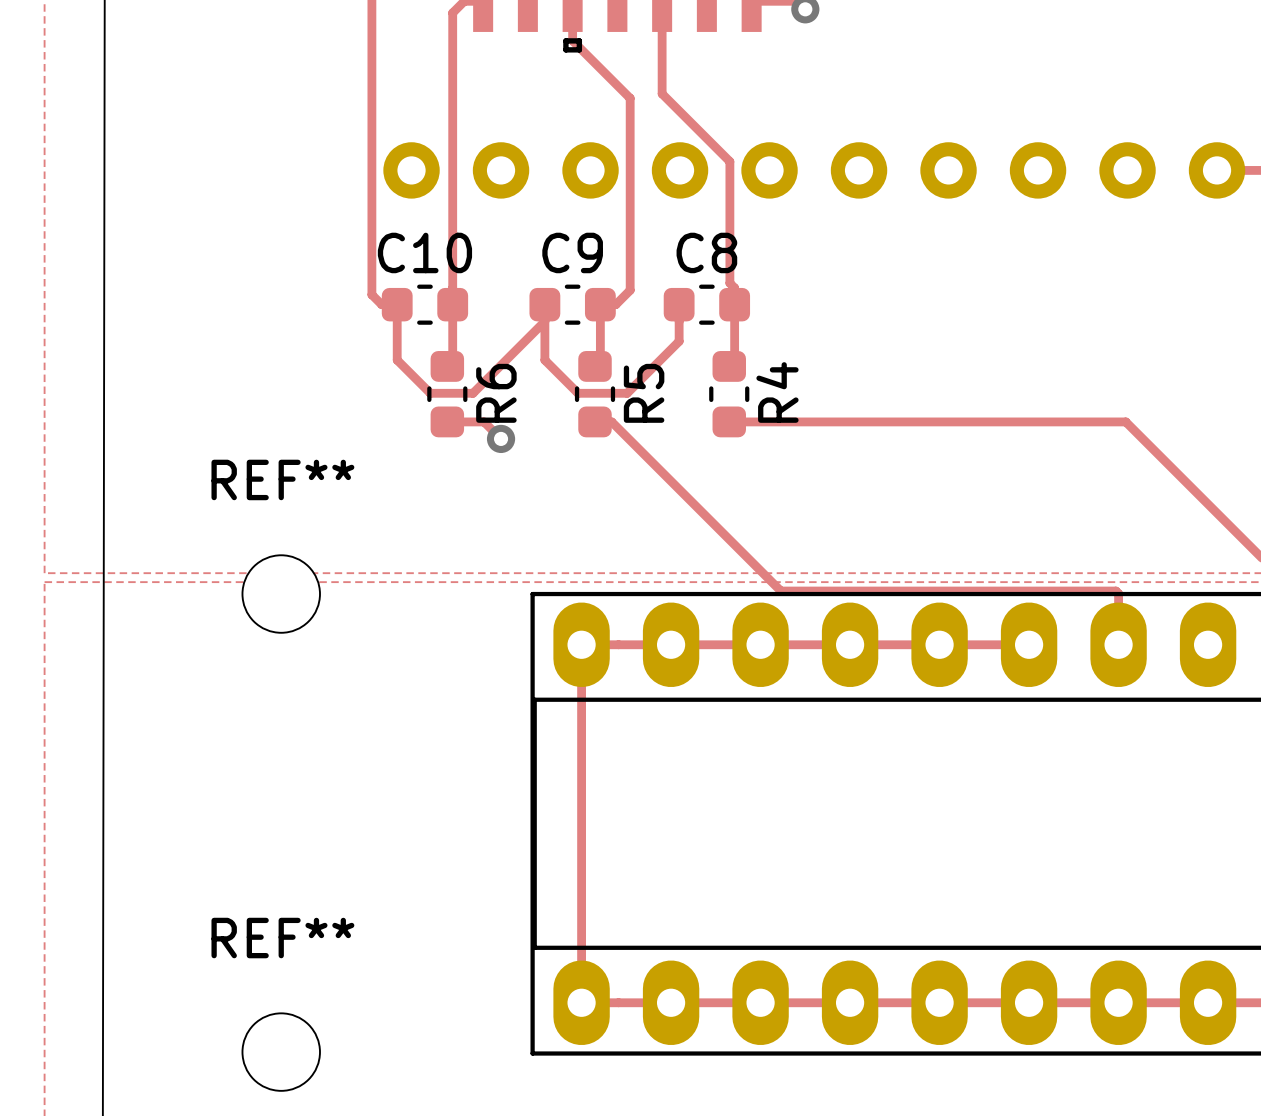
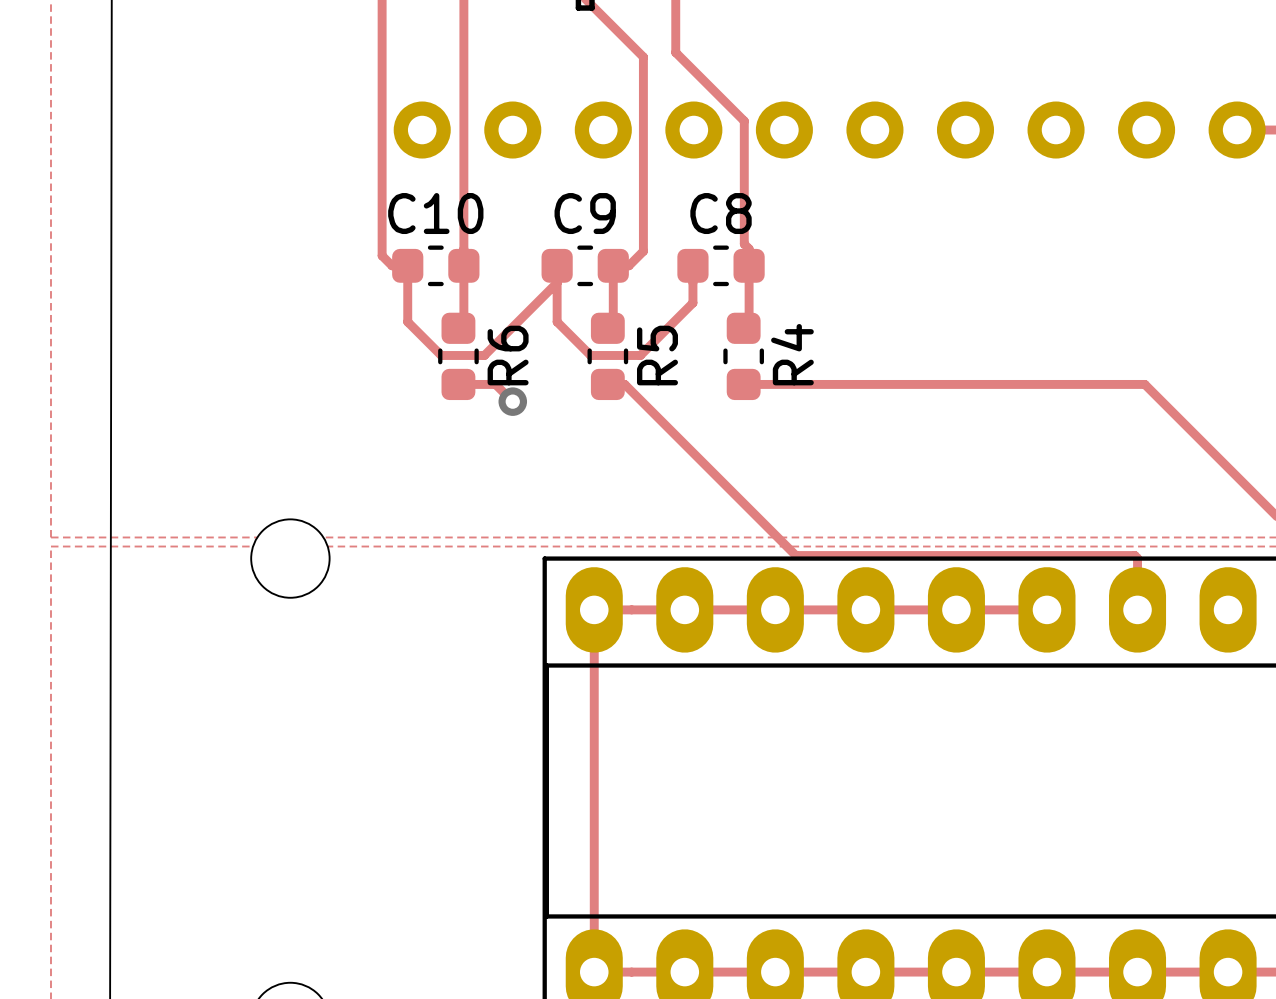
REF** name: REF** (282, 479) -> none
REF** name: REF** (282, 938) -> none

